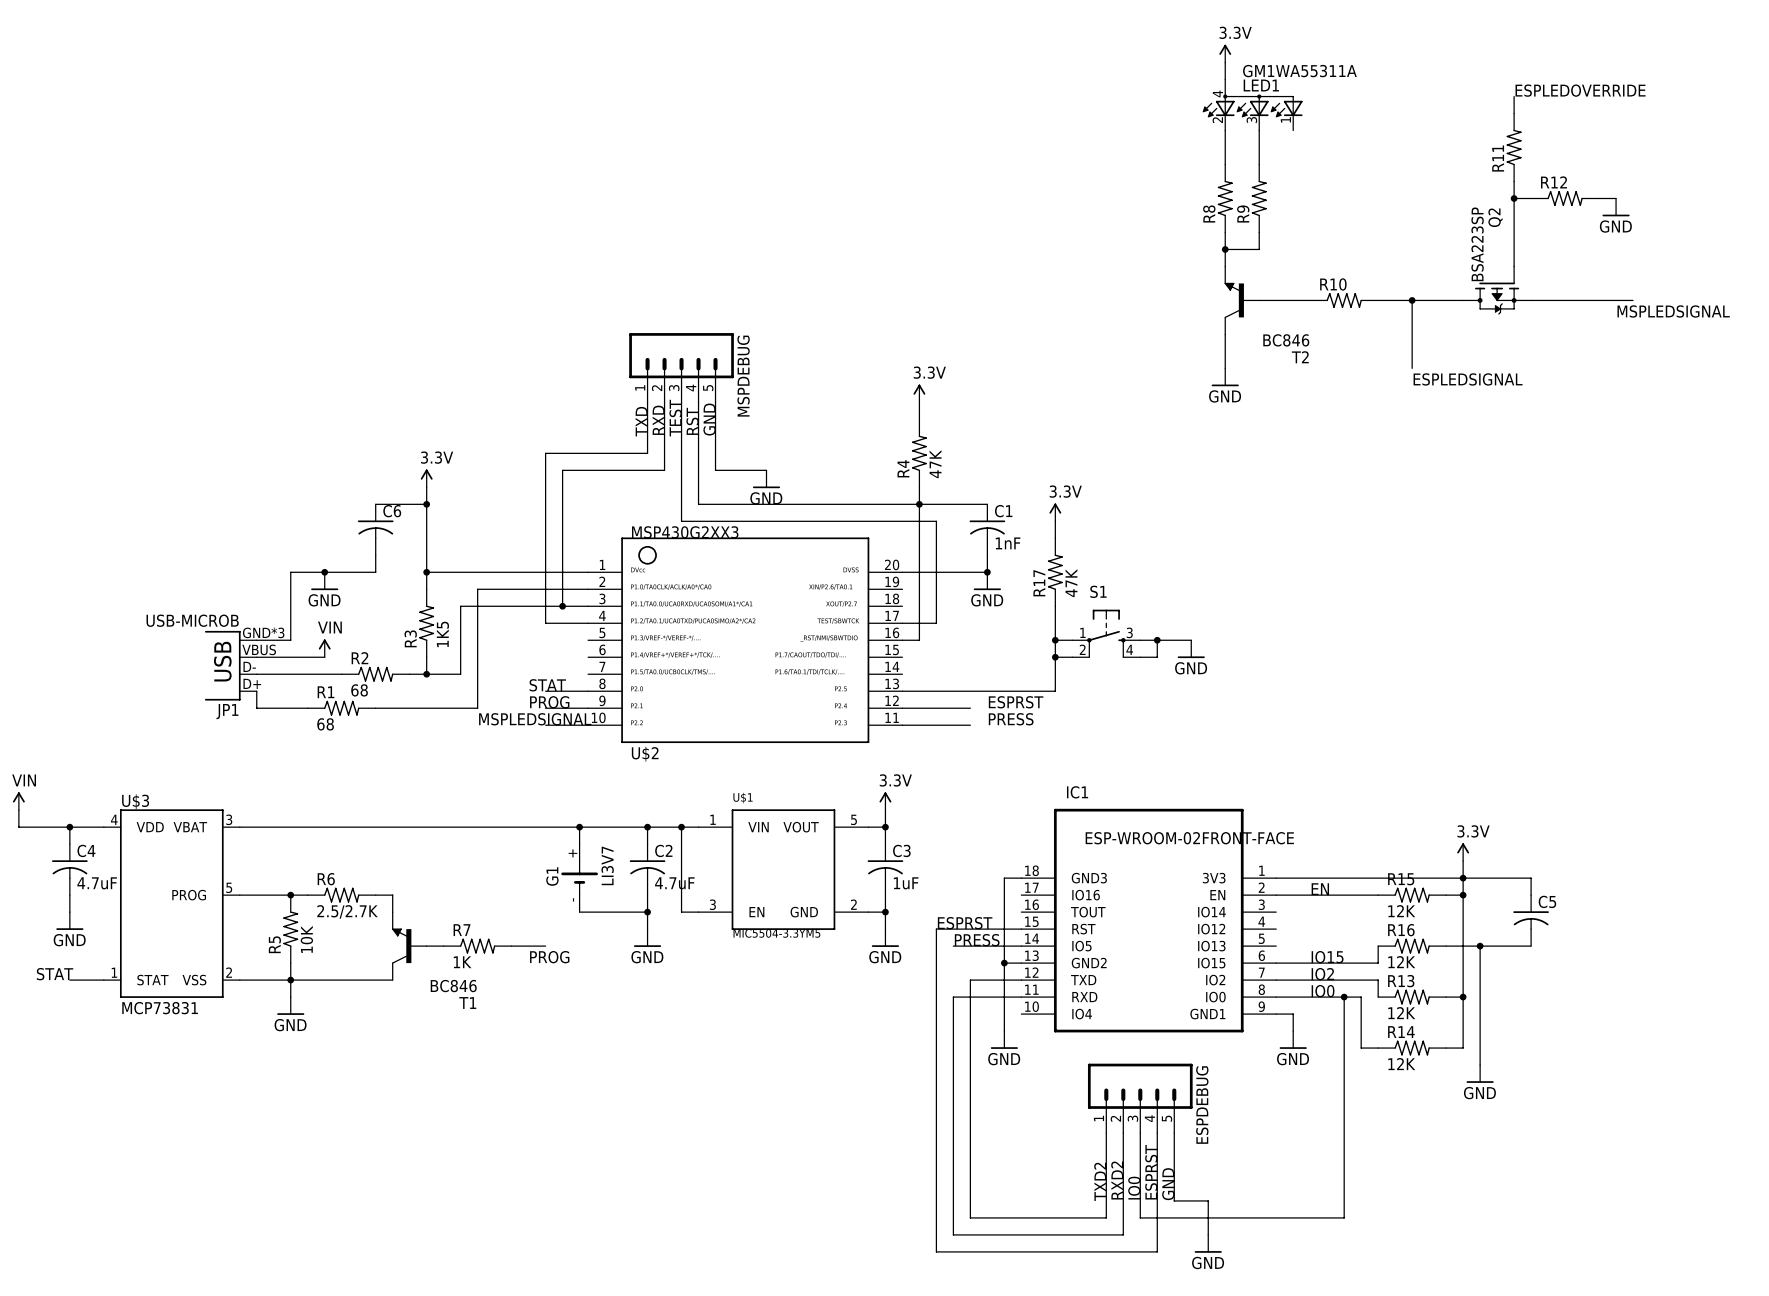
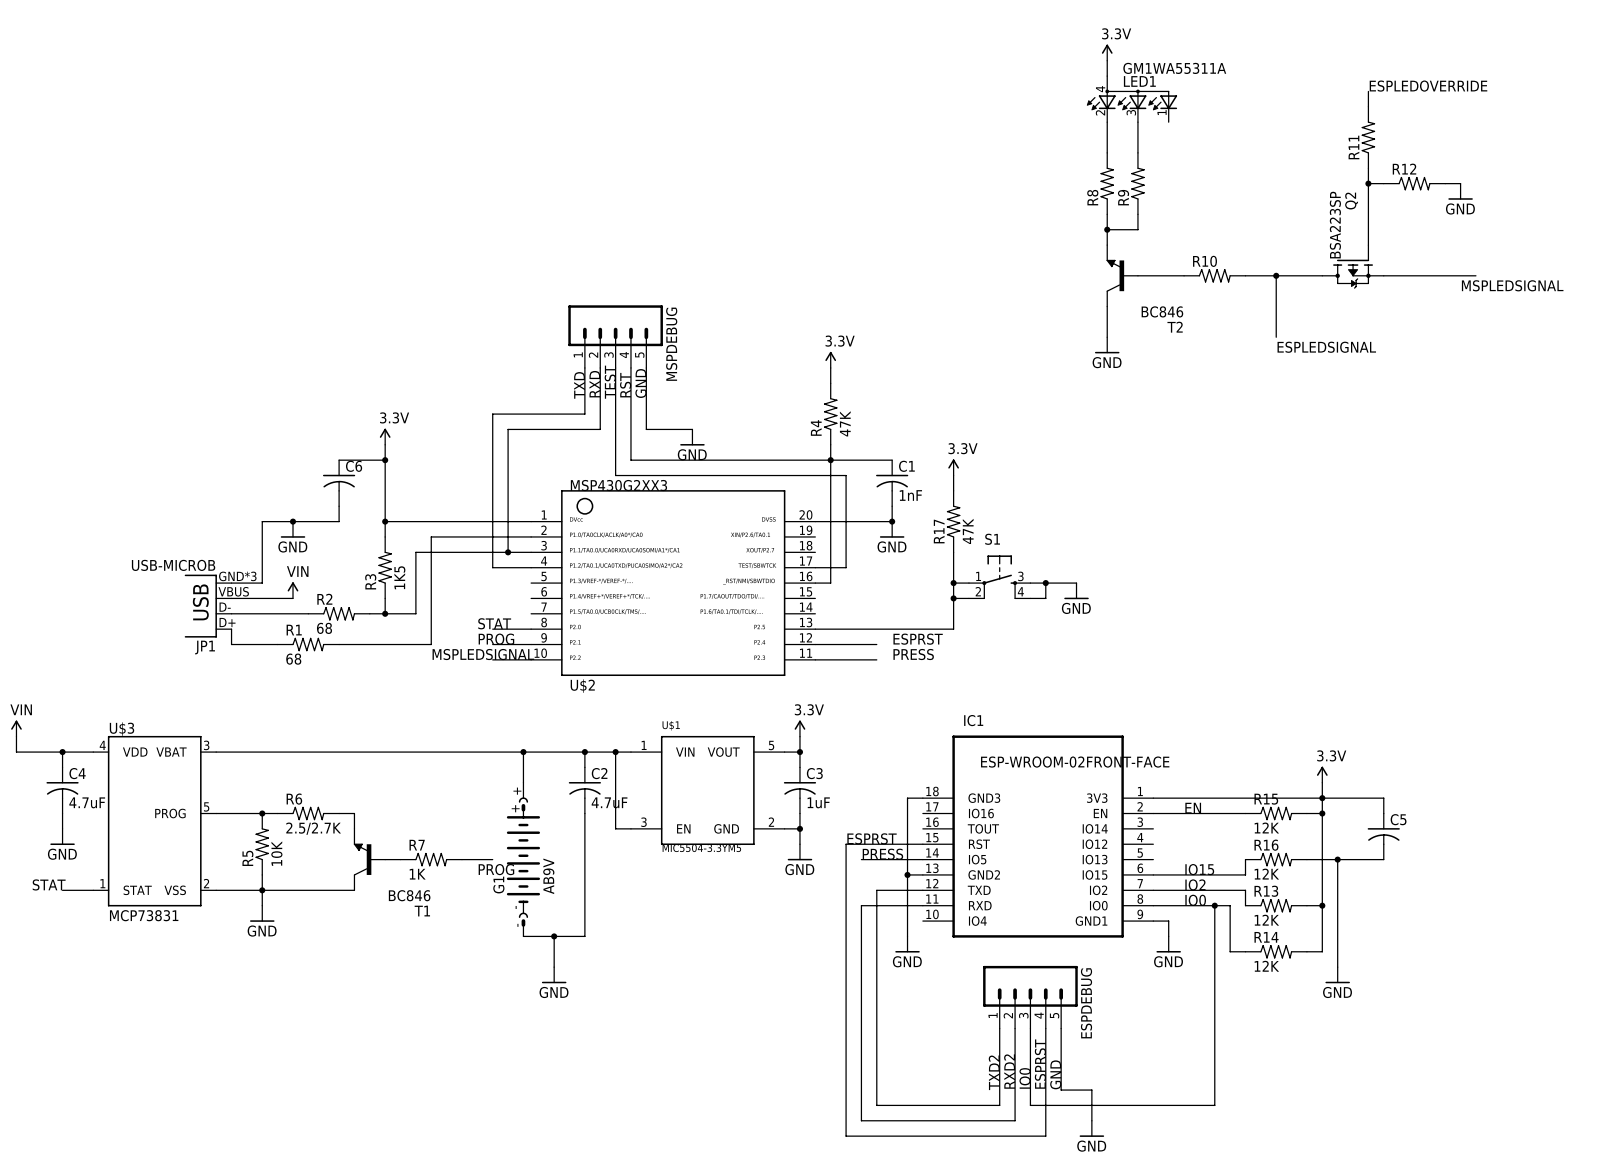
G1 symbol: [561, 844, 598, 913] -> [506, 782, 541, 937]
G1 value: LI3V7 (607, 865) -> AB9V (548, 876)
G1 name position: G1 (552, 876) -> G1 (498, 885)
wire: (579, 912) (647, 912) -> none
junction: (647, 912) -> none
wire: none -> (584, 844) (584, 936) (523, 936)
power symbol position: GND (647, 938) -> GND (554, 975)
wire: none -> (554, 936) (554, 967)
junction: none -> (554, 936)

